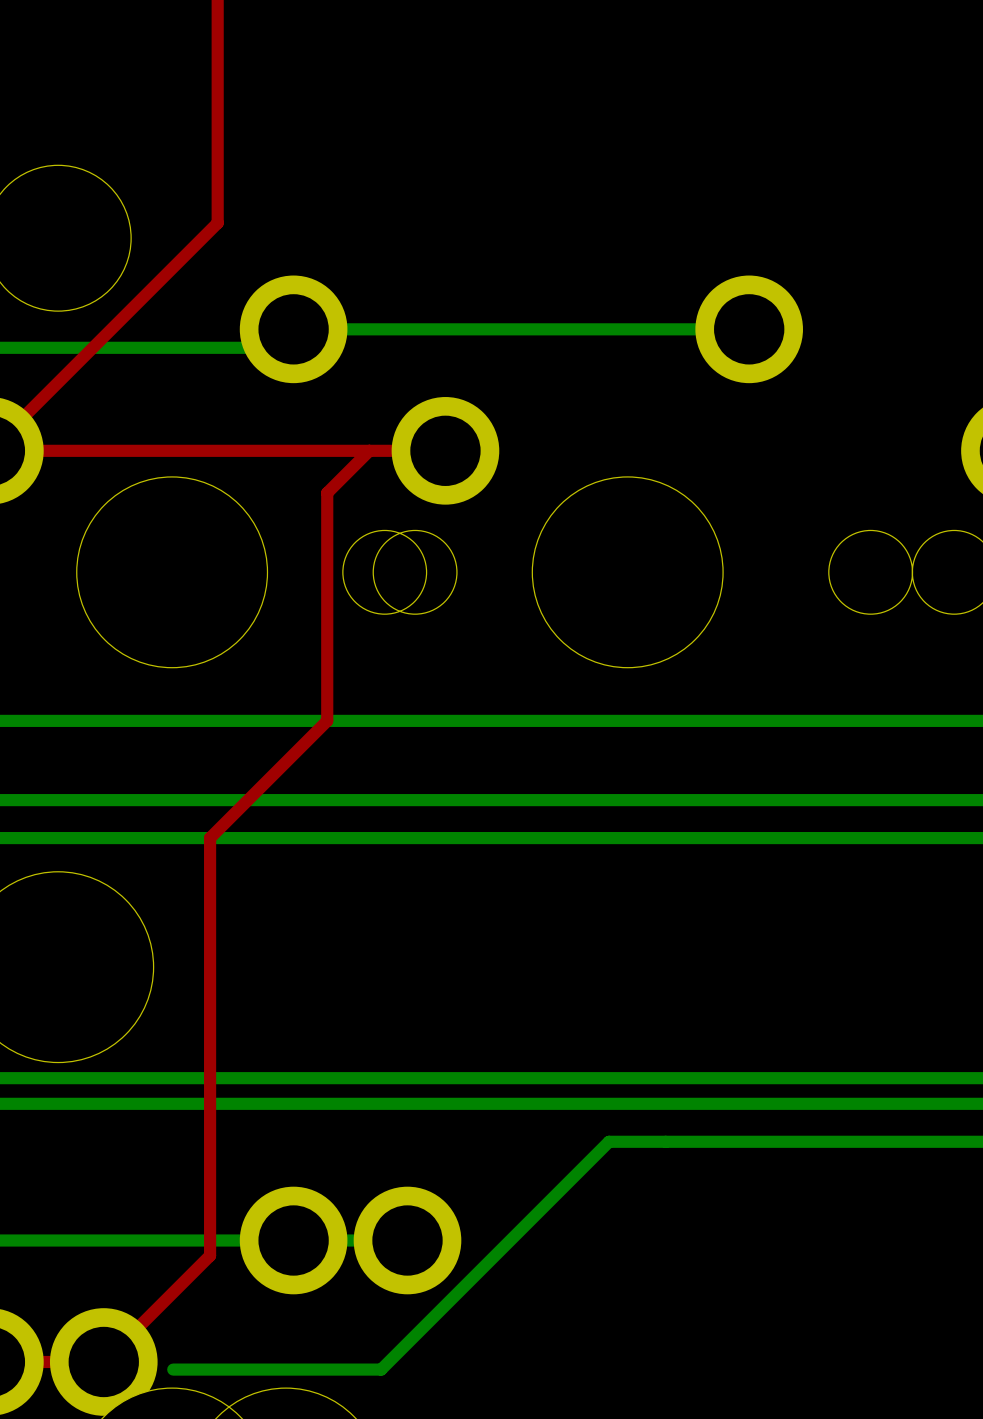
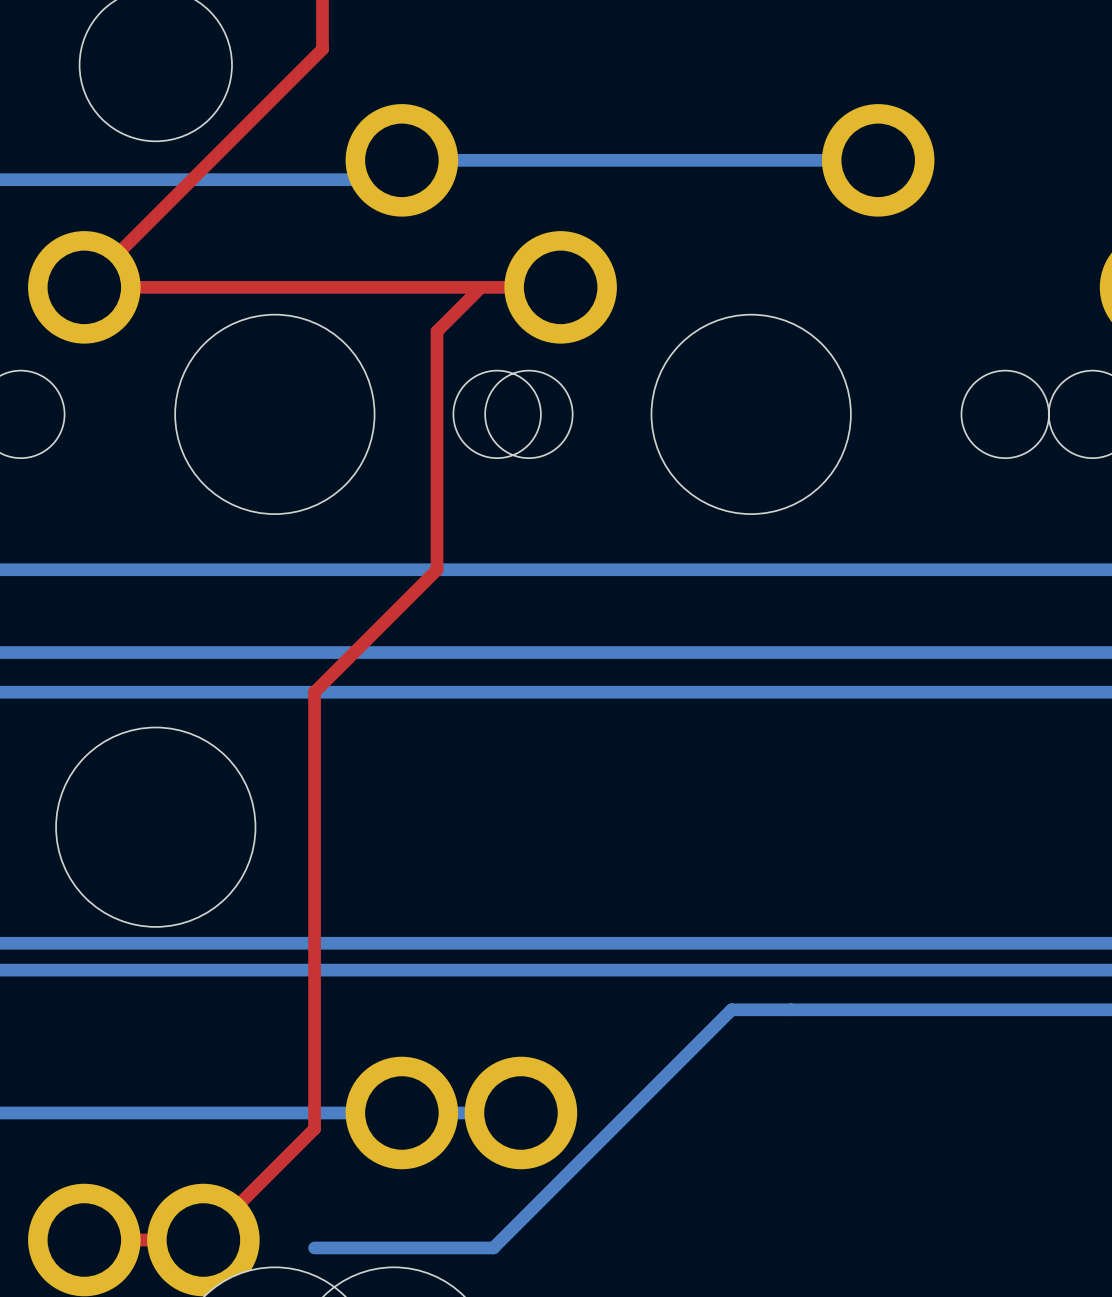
bottom track: (173, 1369) (210, 1369) -> none

